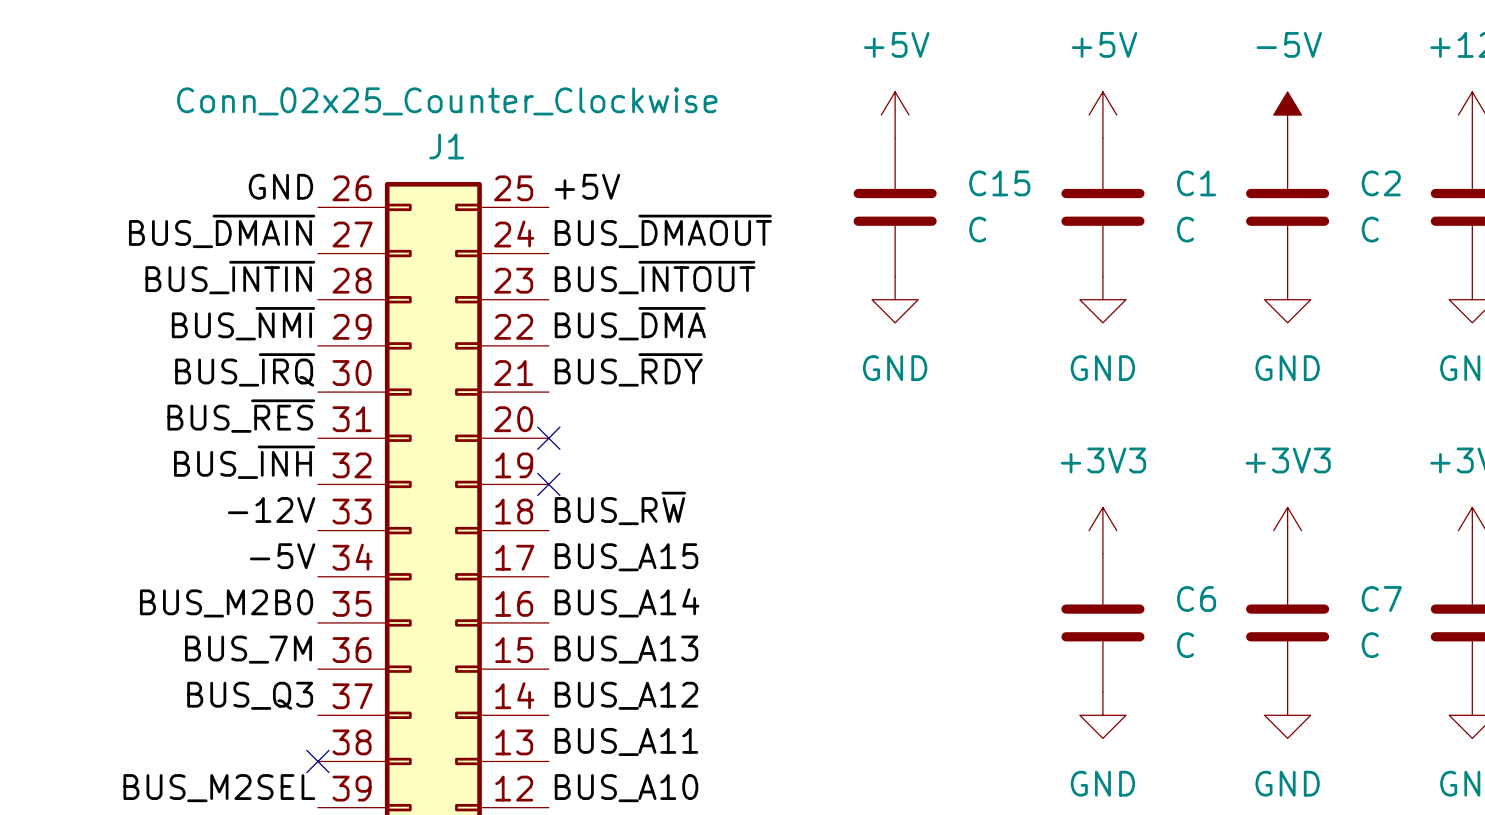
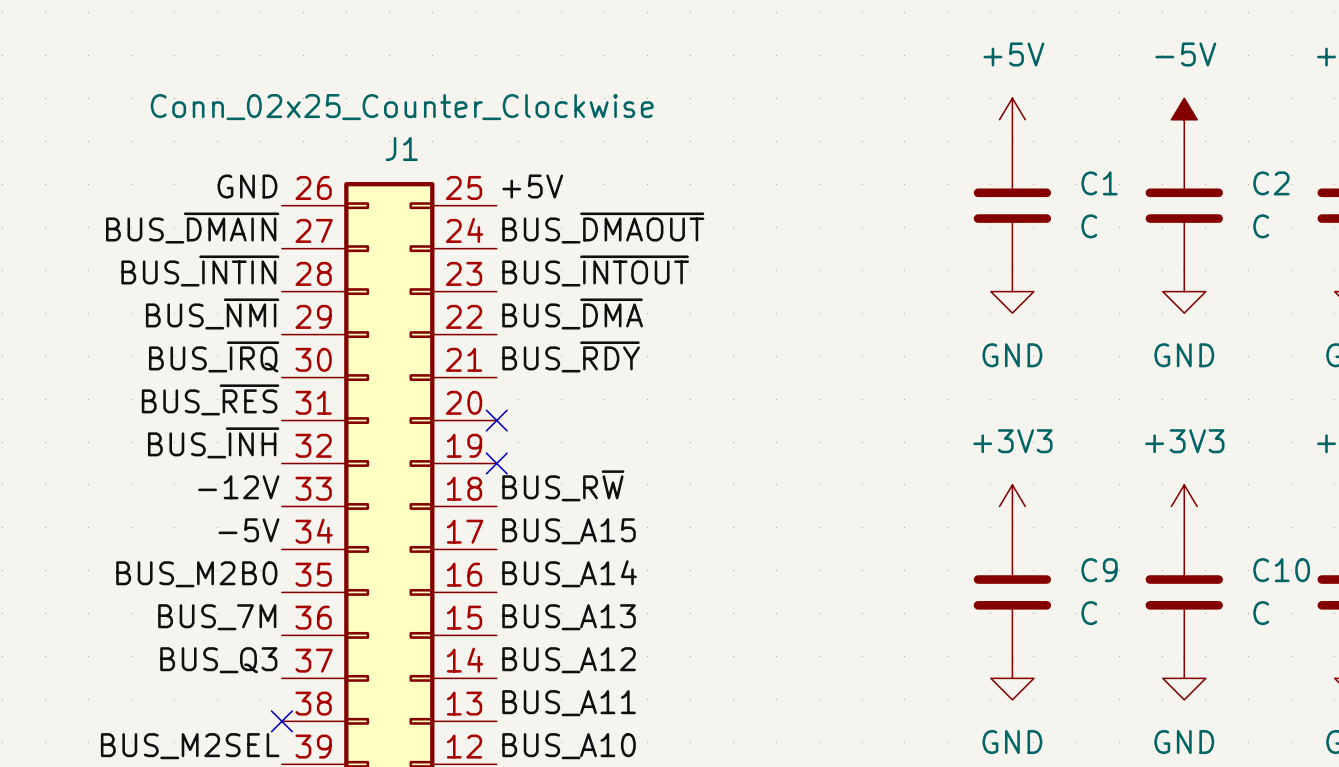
power symbol: +5V (895, 115) -> none
C15: C (895, 207) -> none
power symbol: GND (895, 299) -> none
C6 name: C6 (1196, 598) -> C9 (1099, 570)
C7 name: C7 (1381, 598) -> C10 (1281, 570)

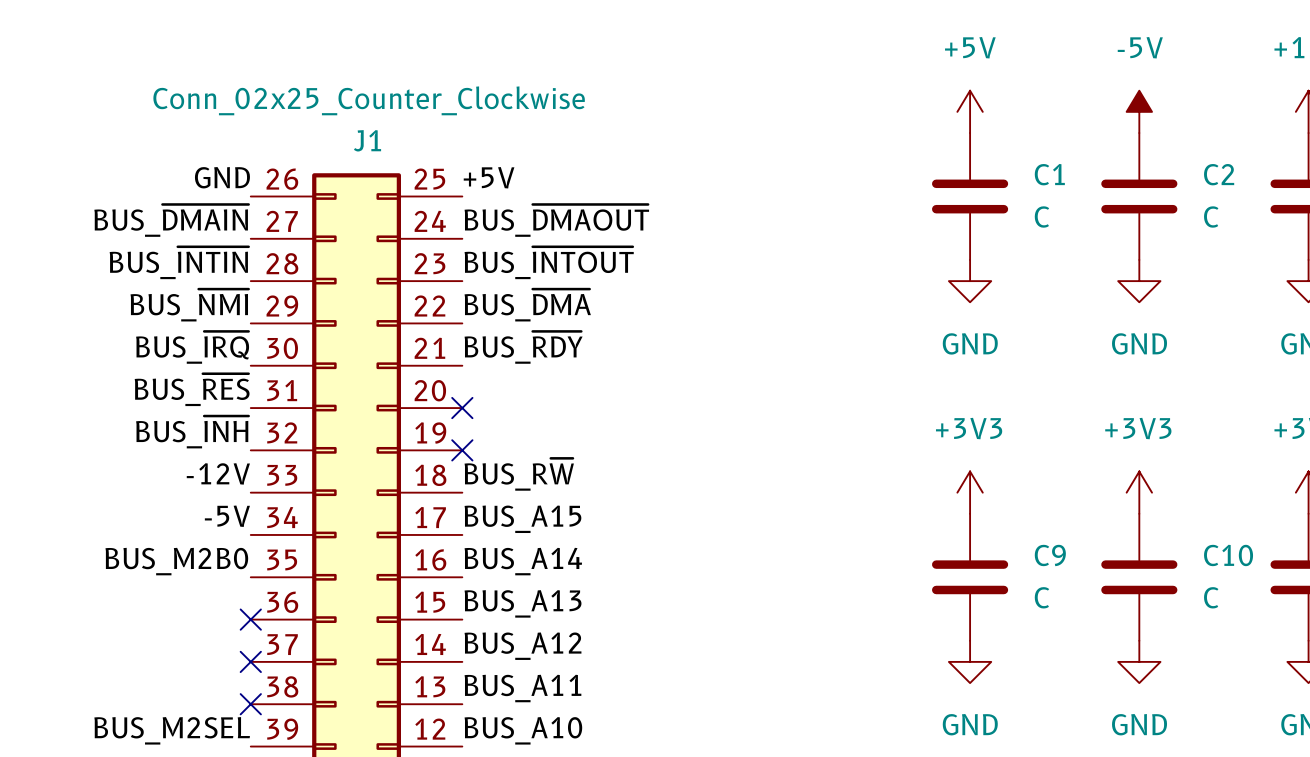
label: BUS_7M (217, 617) -> none
no-connect mark: none -> (250, 619)
label: BUS_Q3 (218, 660) -> none
no-connect mark: none -> (250, 661)

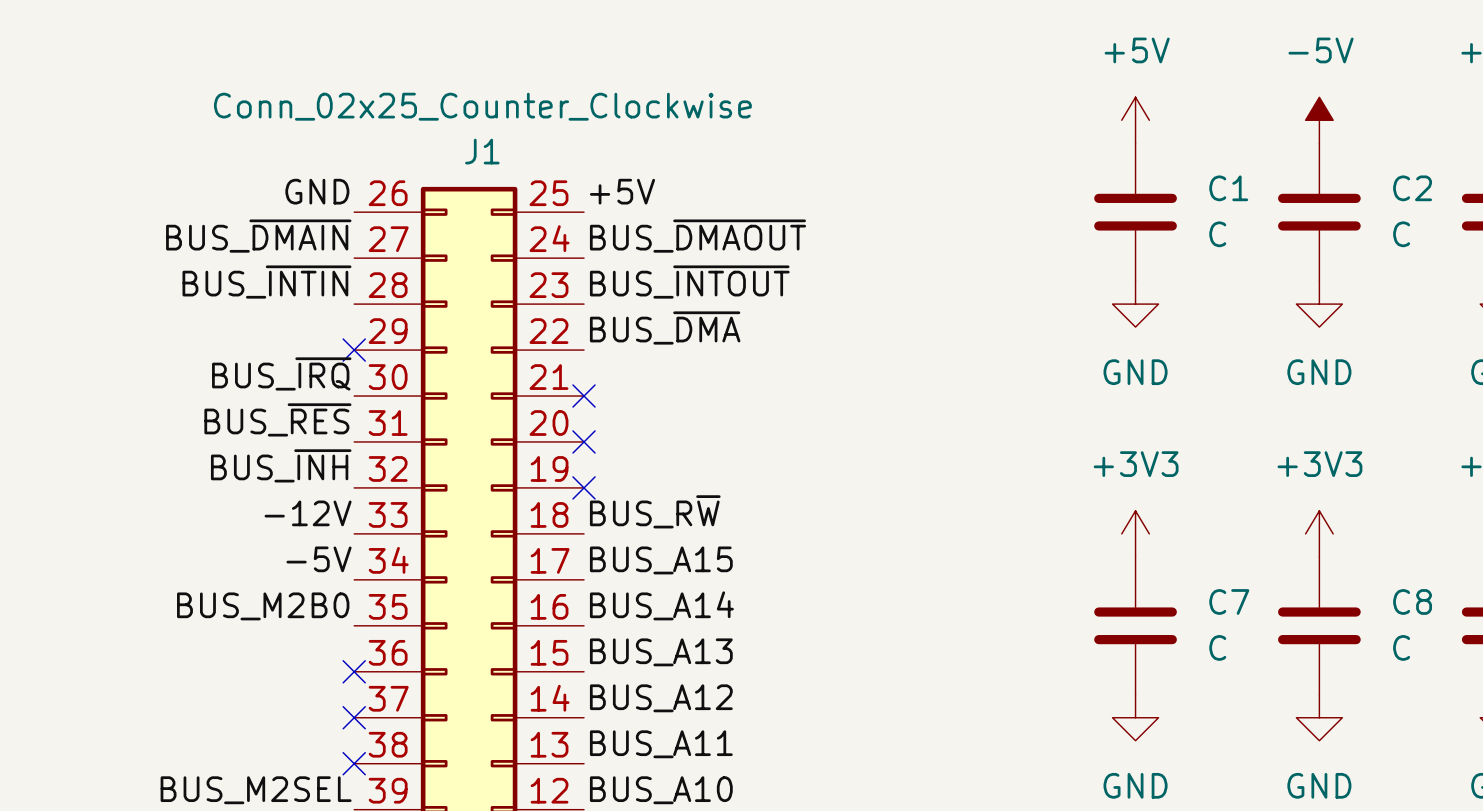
label: BUS_~{NMI} (189, 305) -> none
no-connect mark: none -> (354, 350)
label: BUS_~{RDY} (523, 347) -> none
no-connect mark: none -> (584, 396)
C9 name: C9 (1050, 555) -> C7 (1229, 601)
C10 name: C10 (1228, 555) -> C8 (1412, 601)

